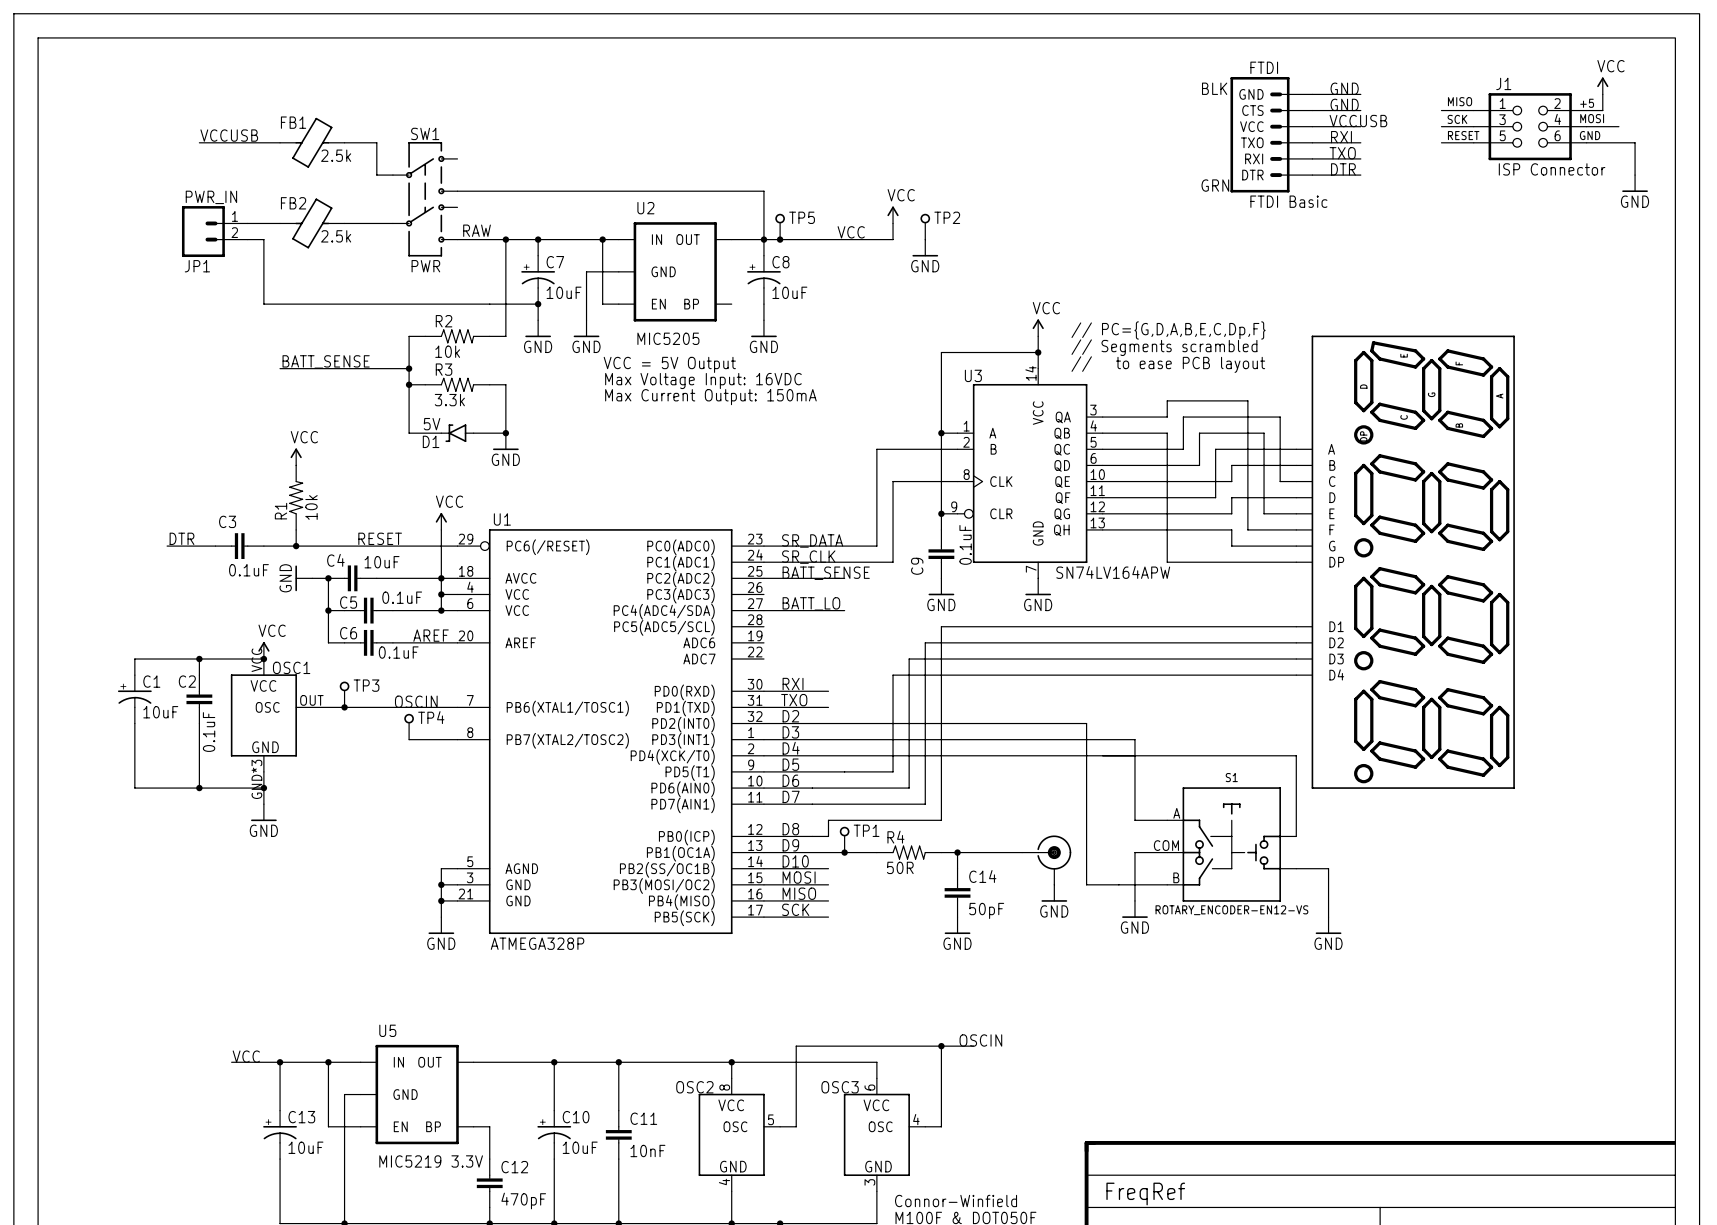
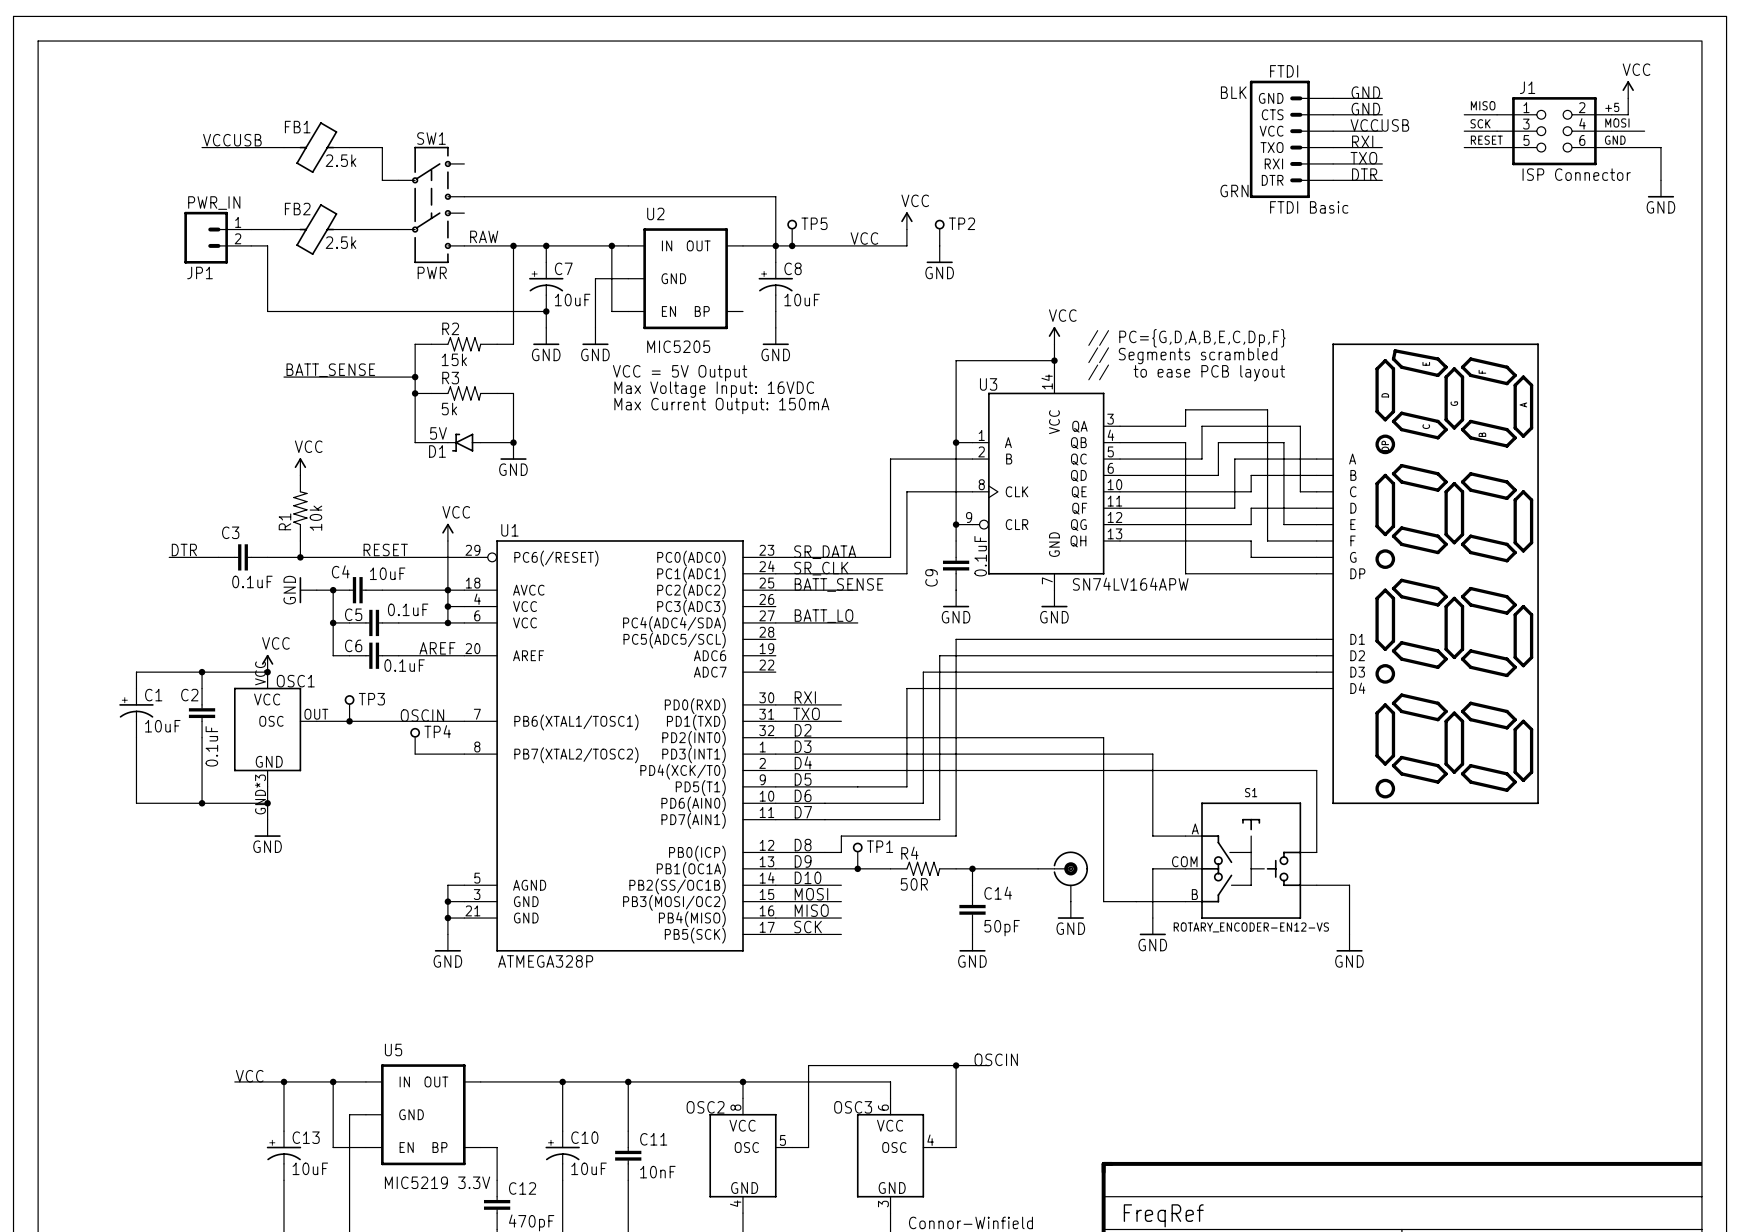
R2 value: 10k (447, 351) -> 15k (454, 359)
R3 value: 3.3k (449, 400) -> 5k (449, 409)

